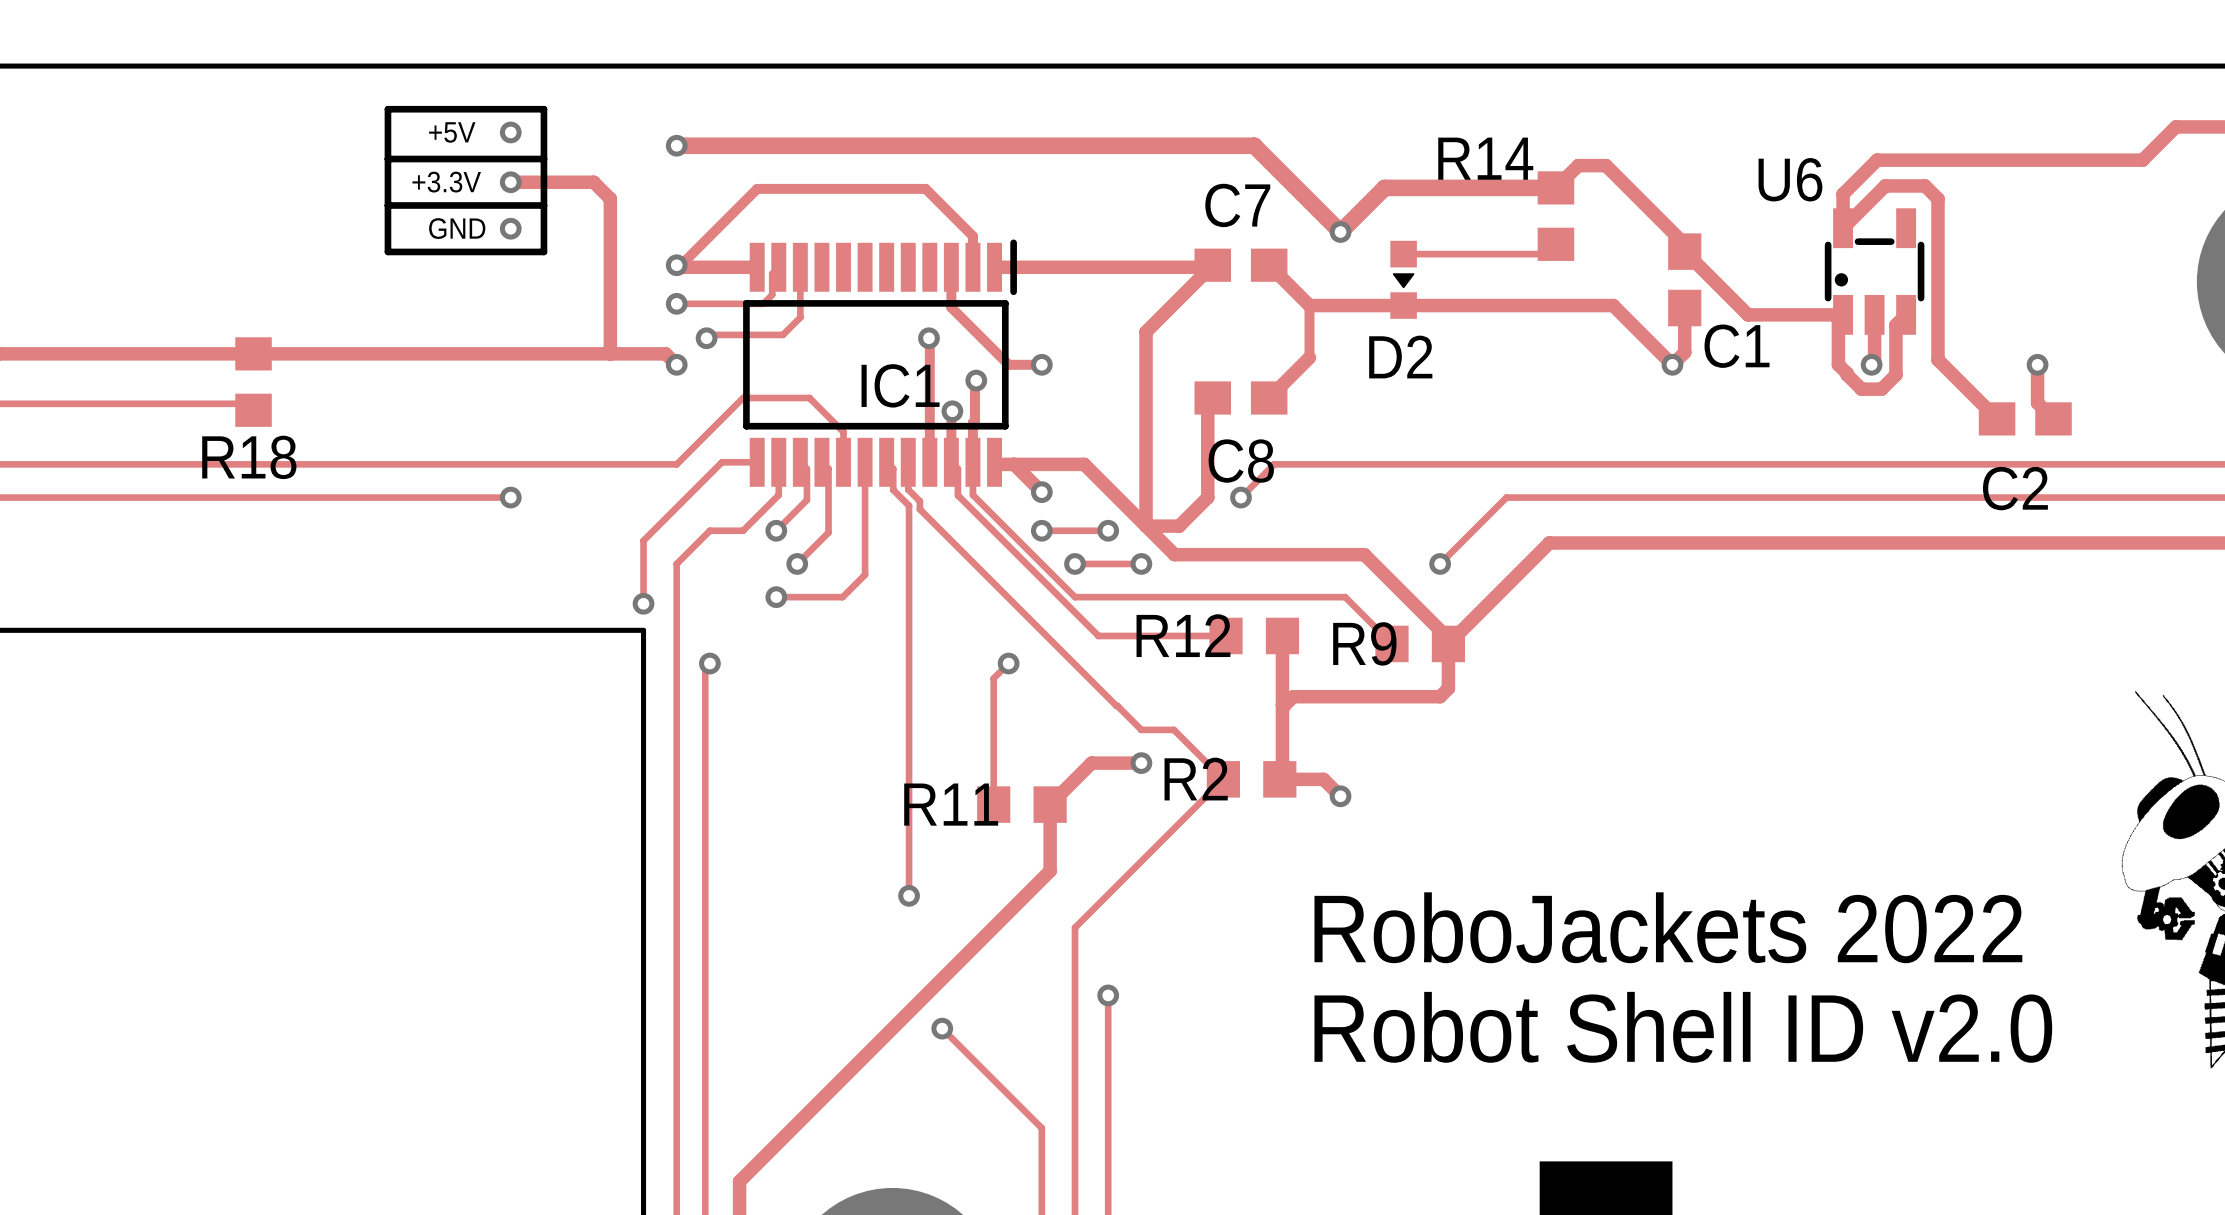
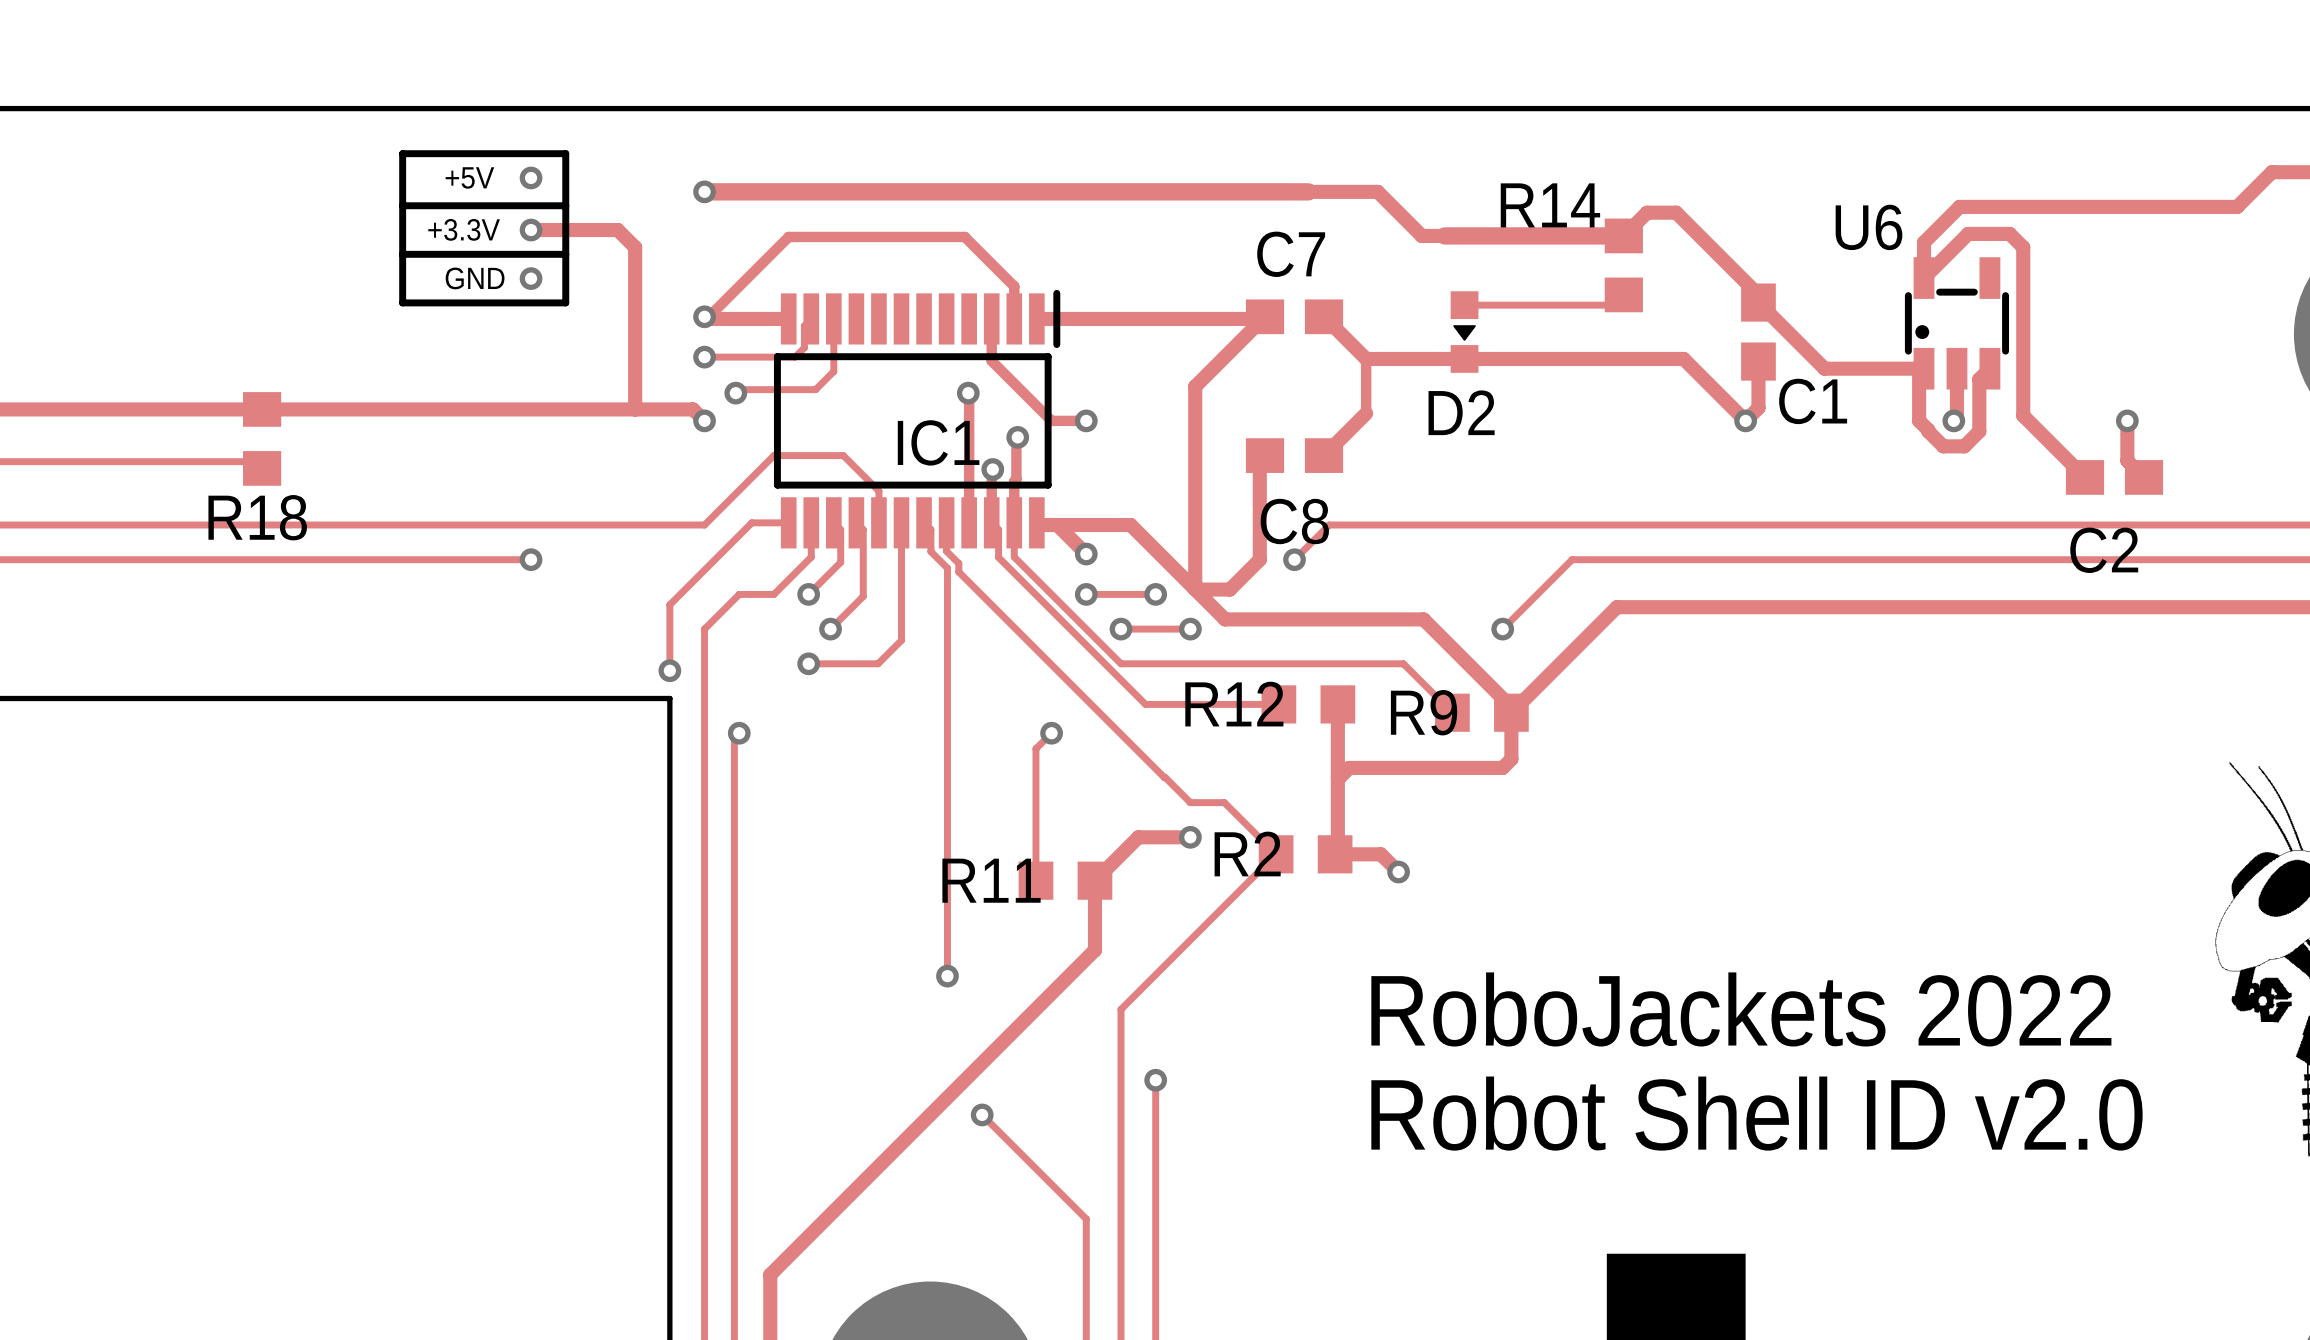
track: (1254, 145) (1340, 232) (1384, 187) -> (1308, 191) (1377, 191) (1421, 235) (1444, 235)
via: (1340, 232) -> none

